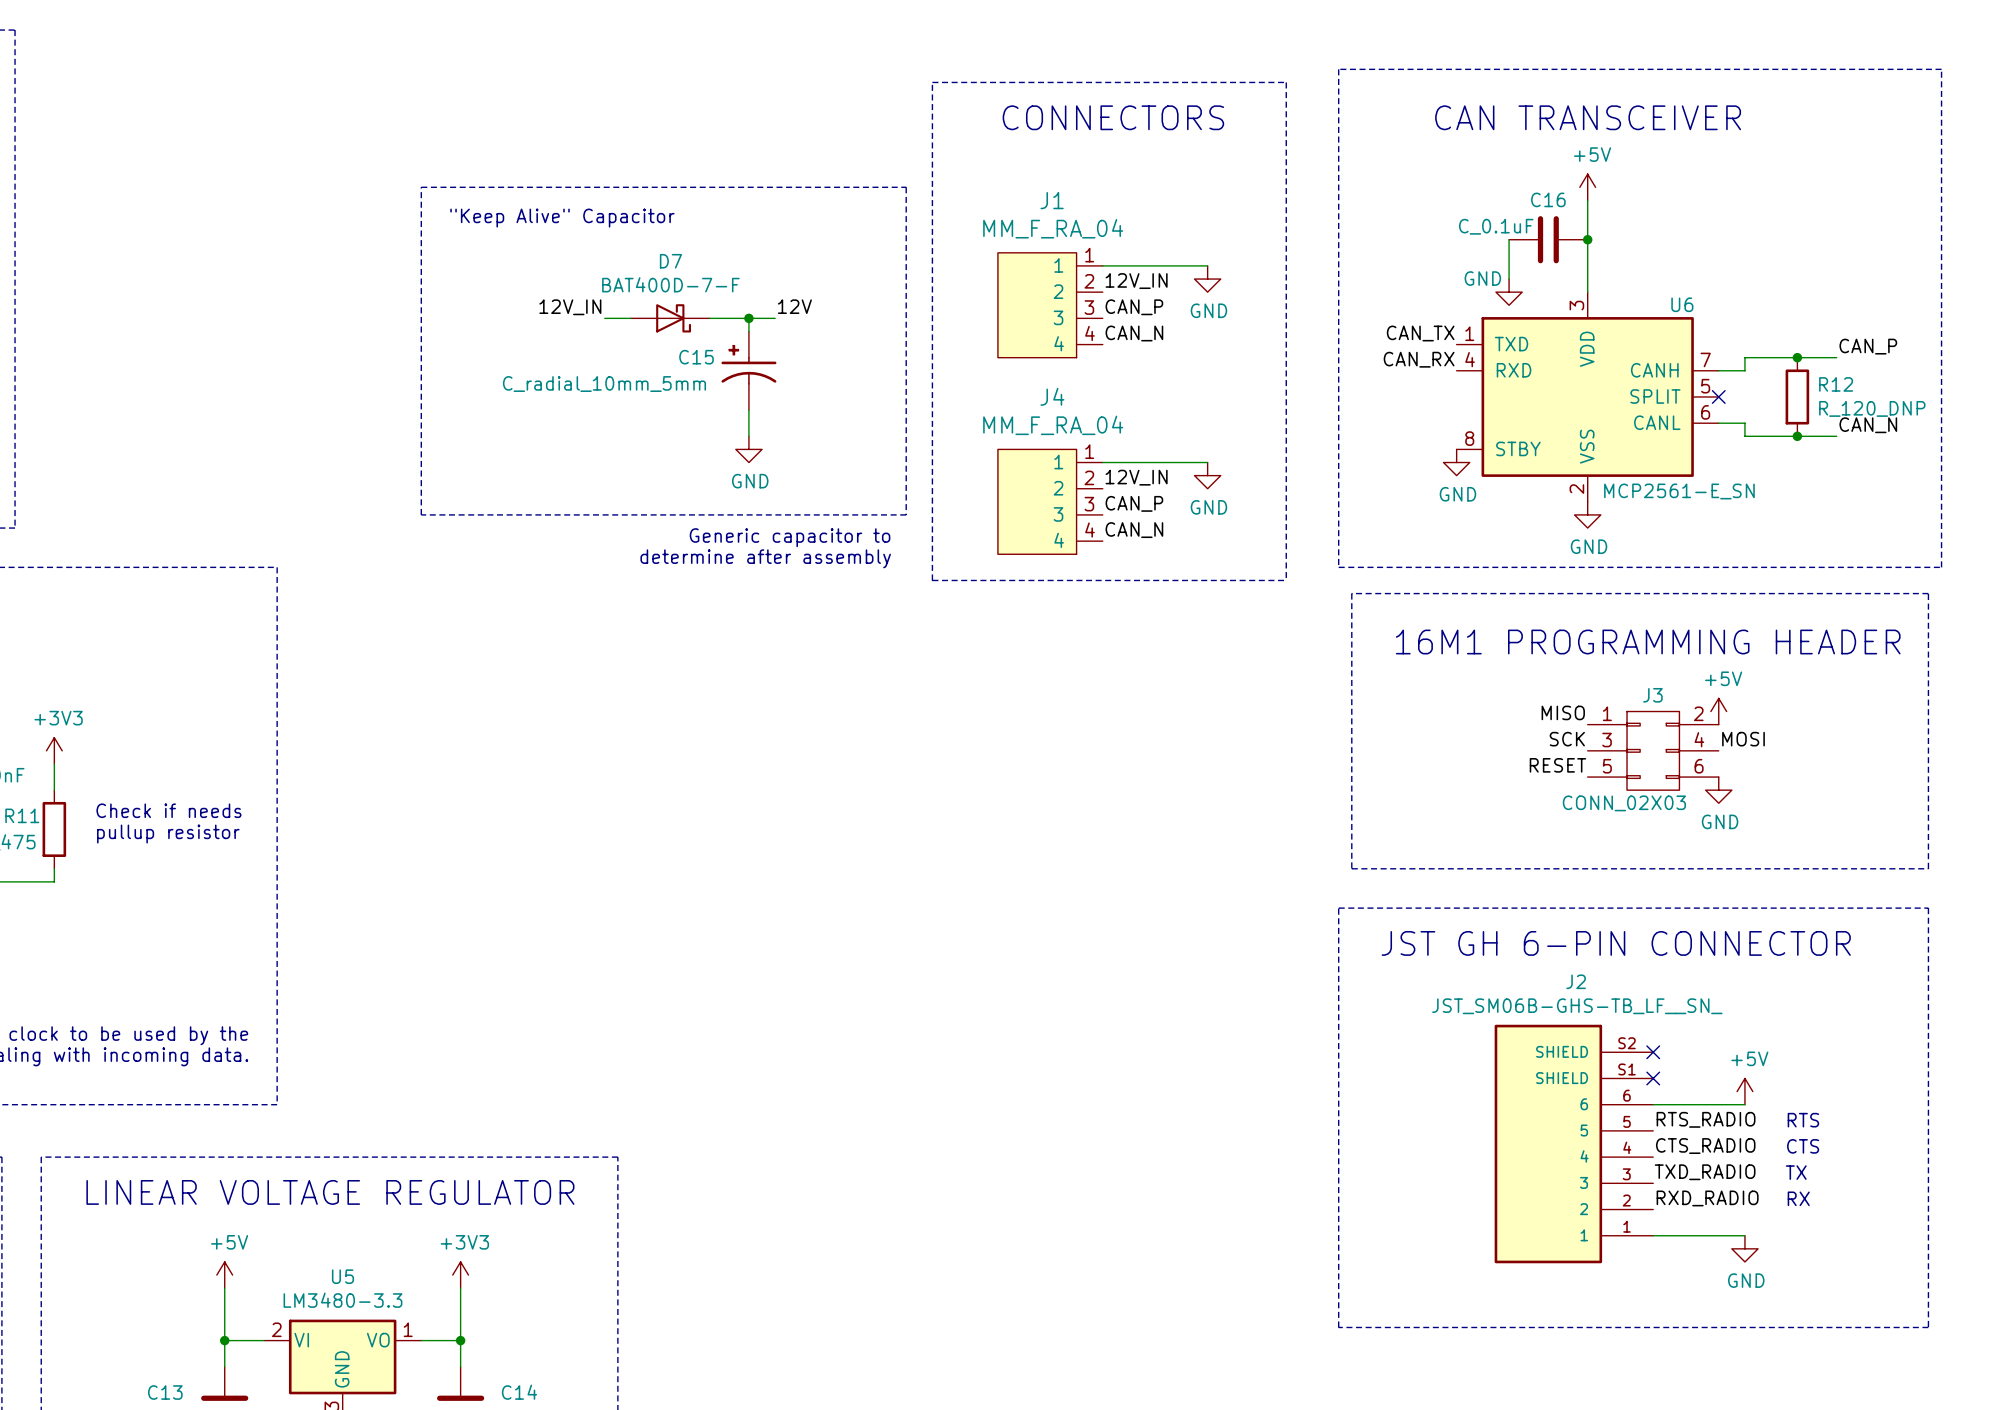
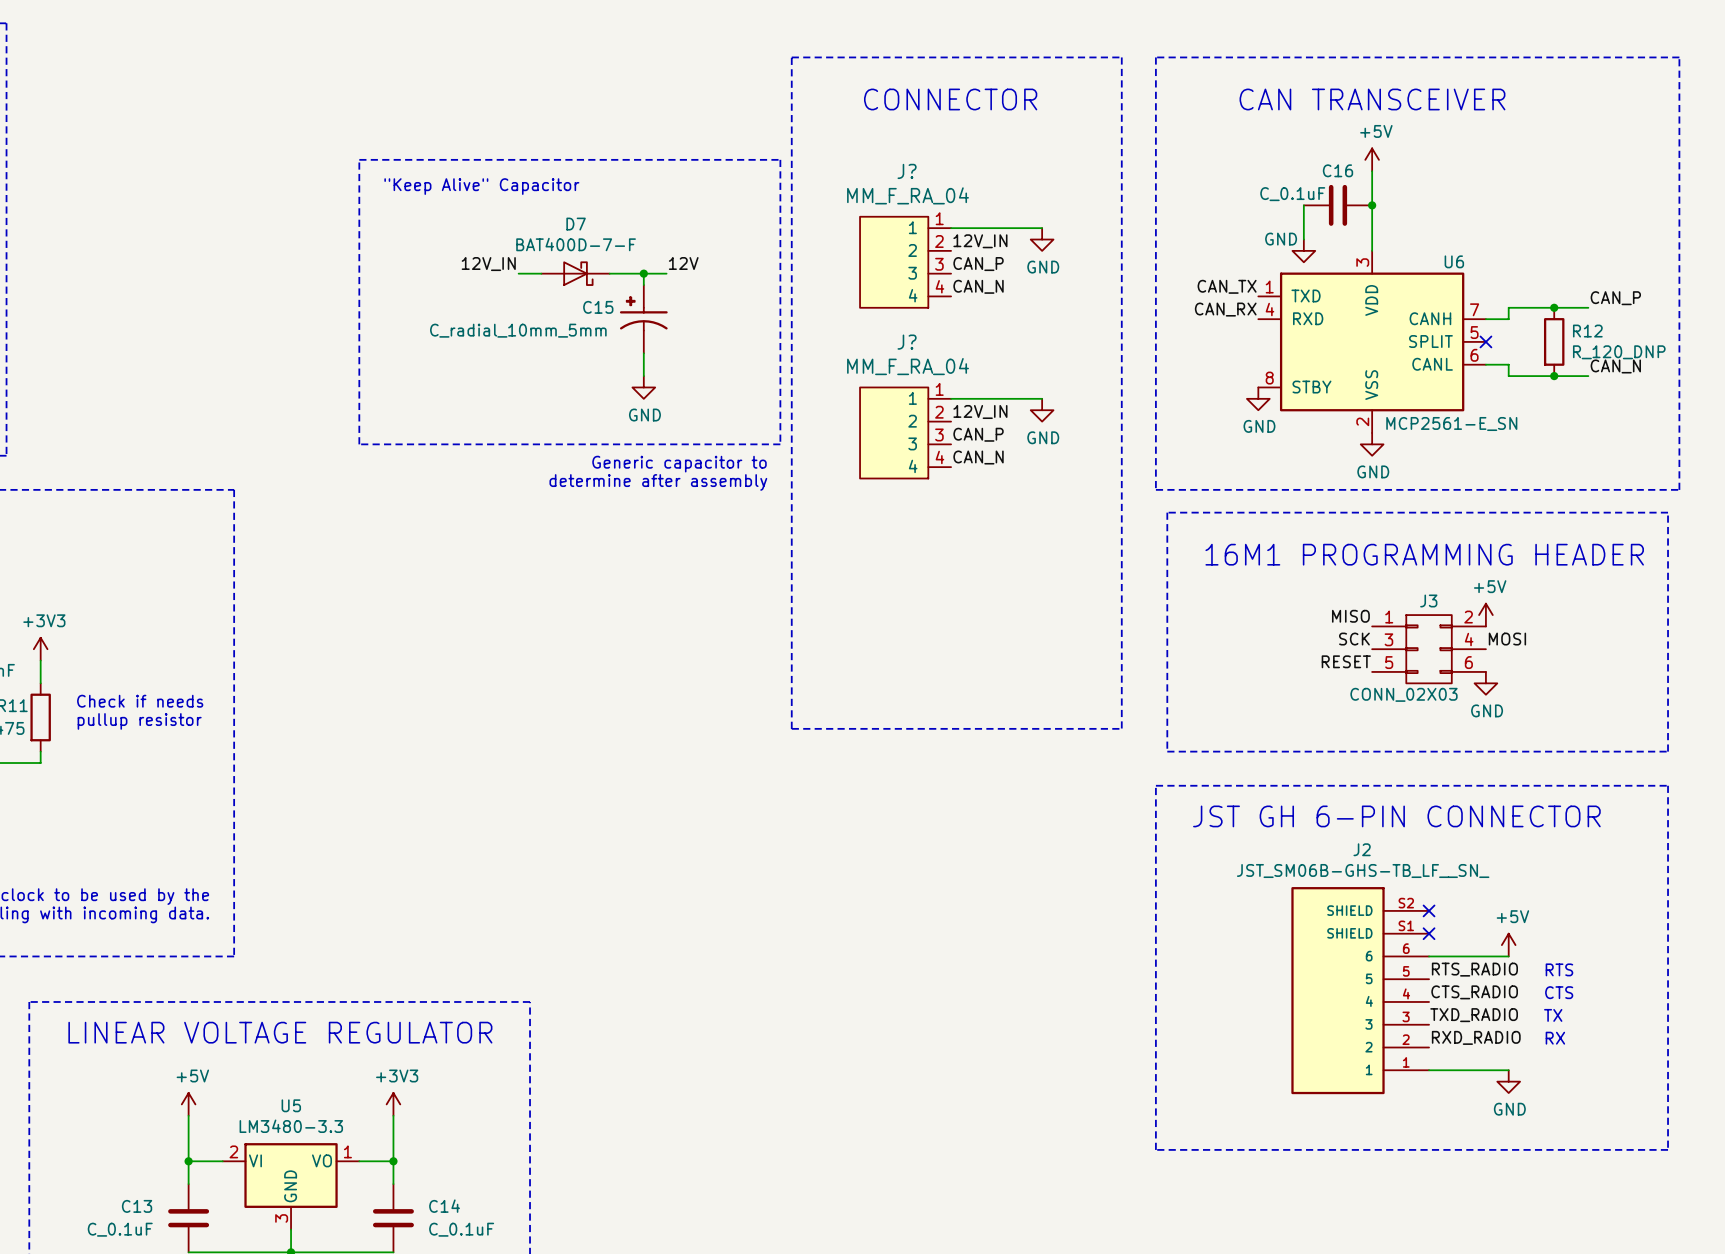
line: (932, 82) (1286, 82) (1286, 580) (932, 580) (932, 82) -> (791, 57) (791, 728) (1121, 728) (1121, 57) (791, 57)
text: CONNECTORS (1113, 117) -> CONNECTOR (950, 99)
J1 name: J1 (1052, 200) -> J? (907, 171)
J4 name: J4 (1052, 396) -> J? (907, 342)

